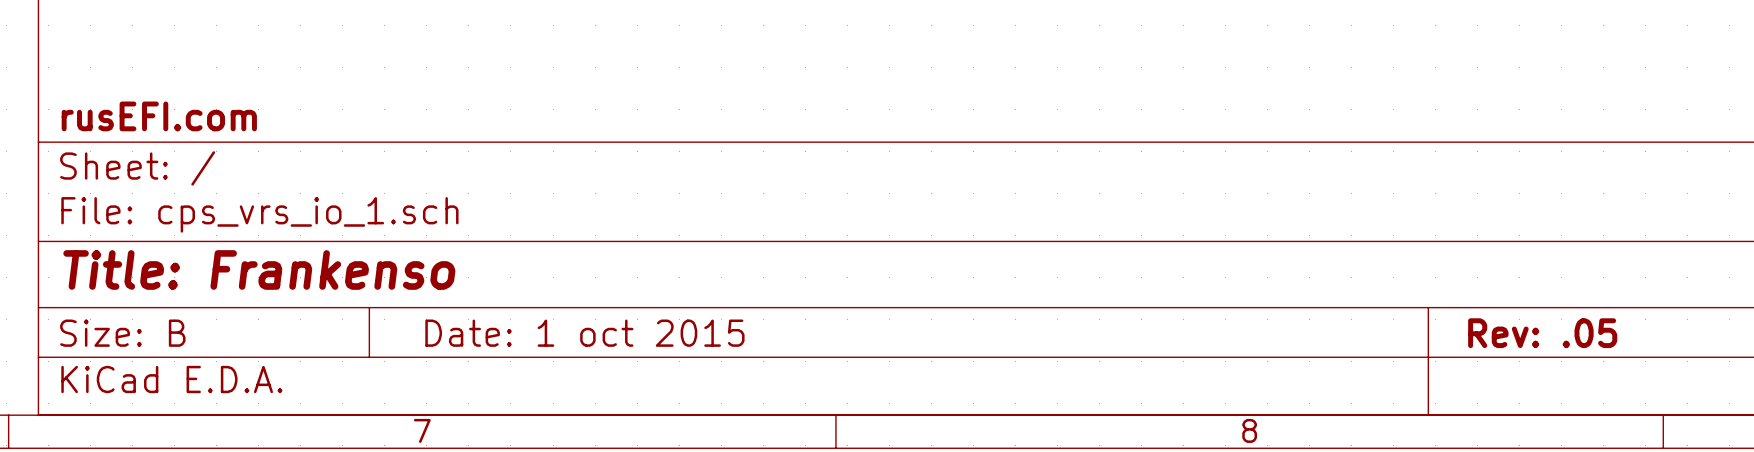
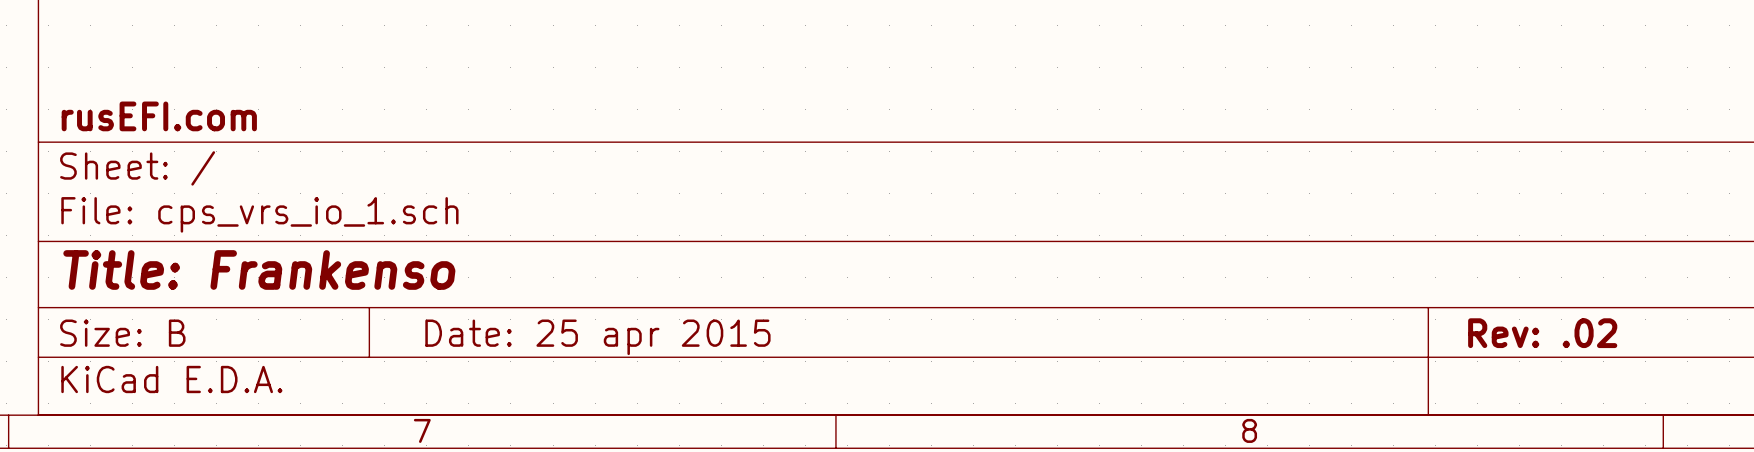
title block: Date: 1 oct 2015 (584, 333) -> Date: 25 apr 2015 (597, 337)
title block: Rev: .05 (1542, 333) -> Rev: .02 (1542, 333)

